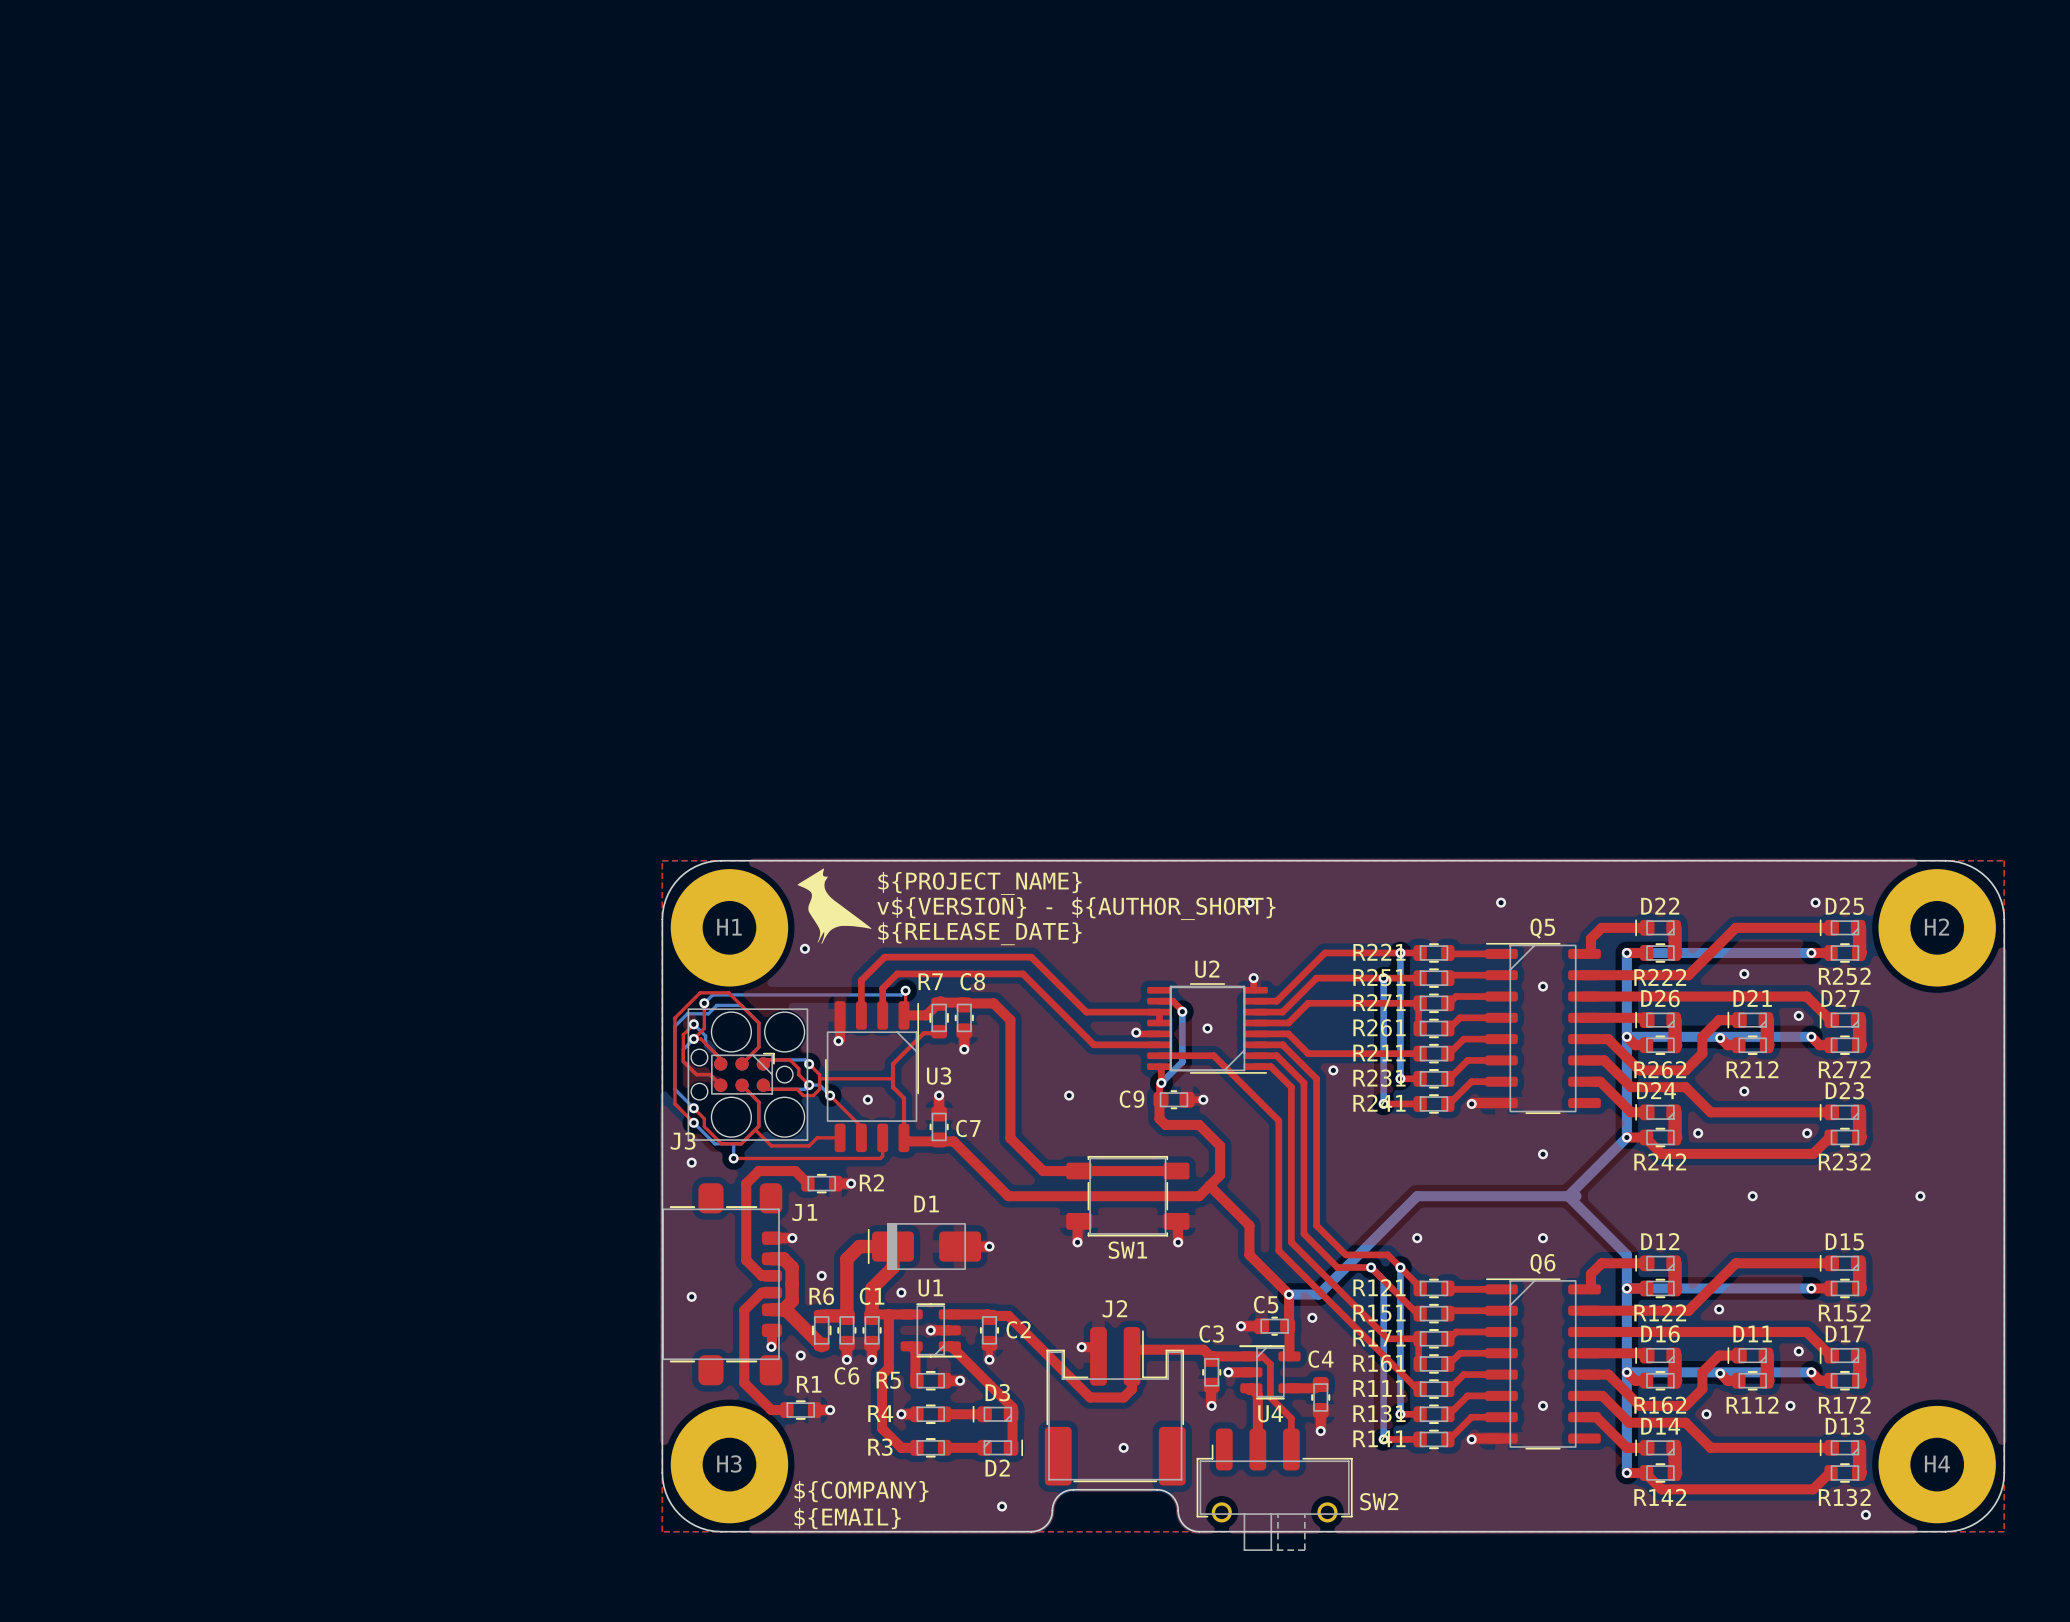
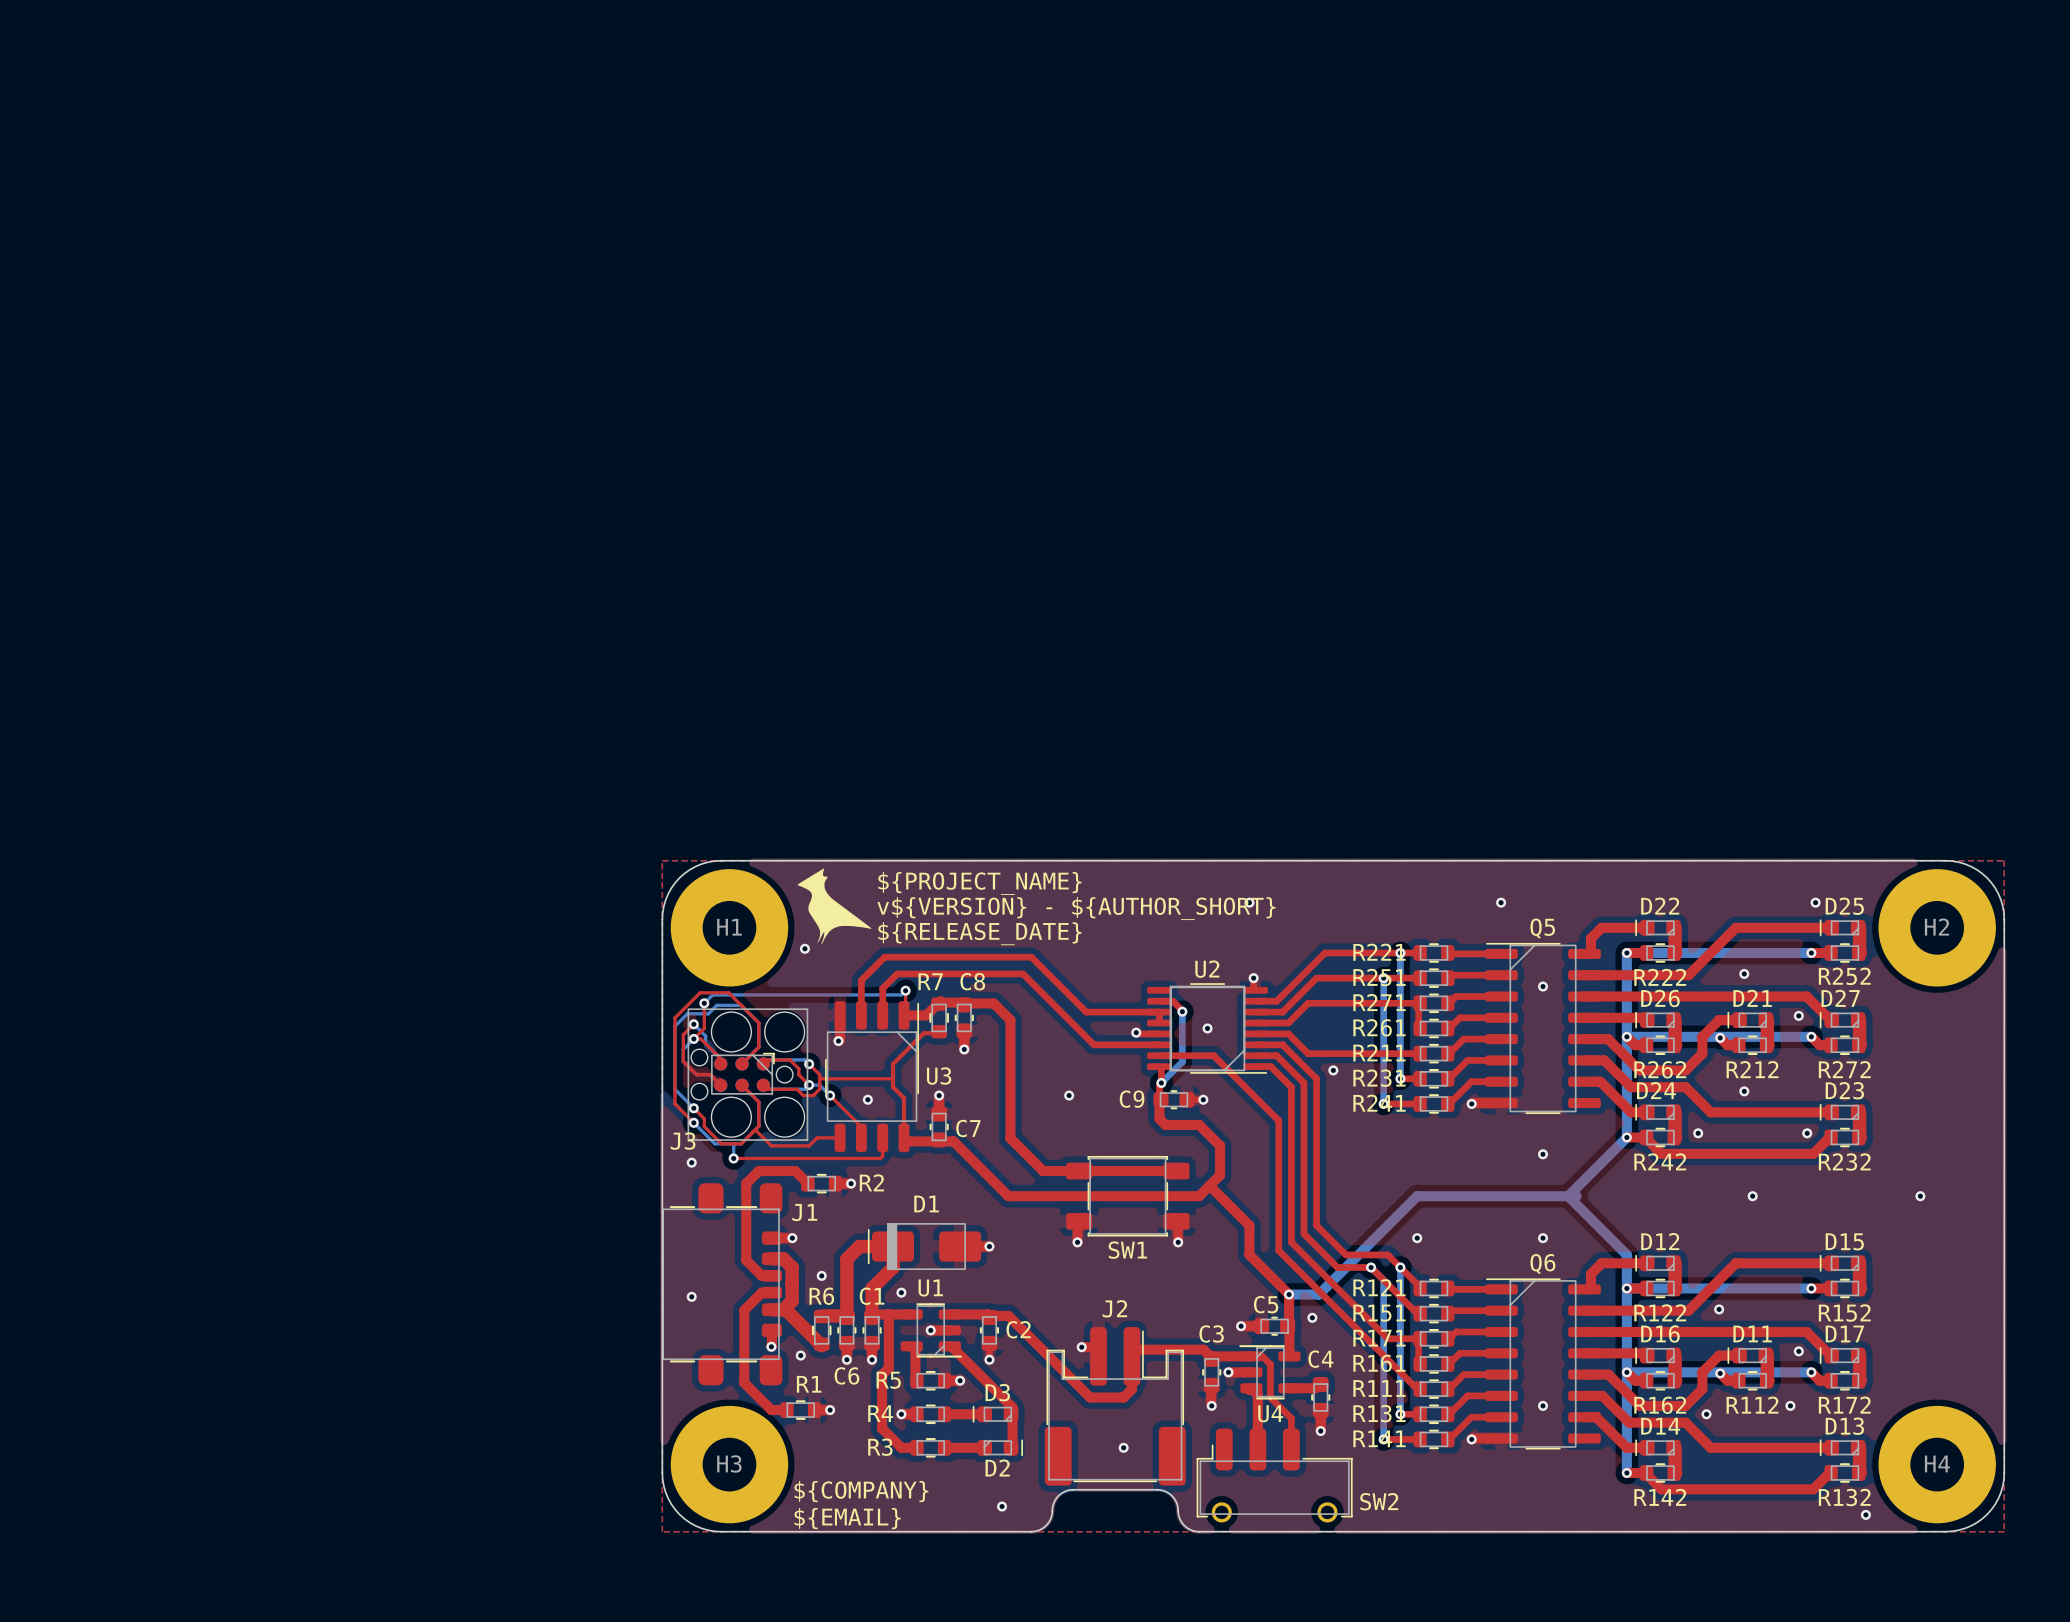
SW2 footprint: [1196, 1428, 1353, 1551] -> [1196, 1428, 1353, 1523]

